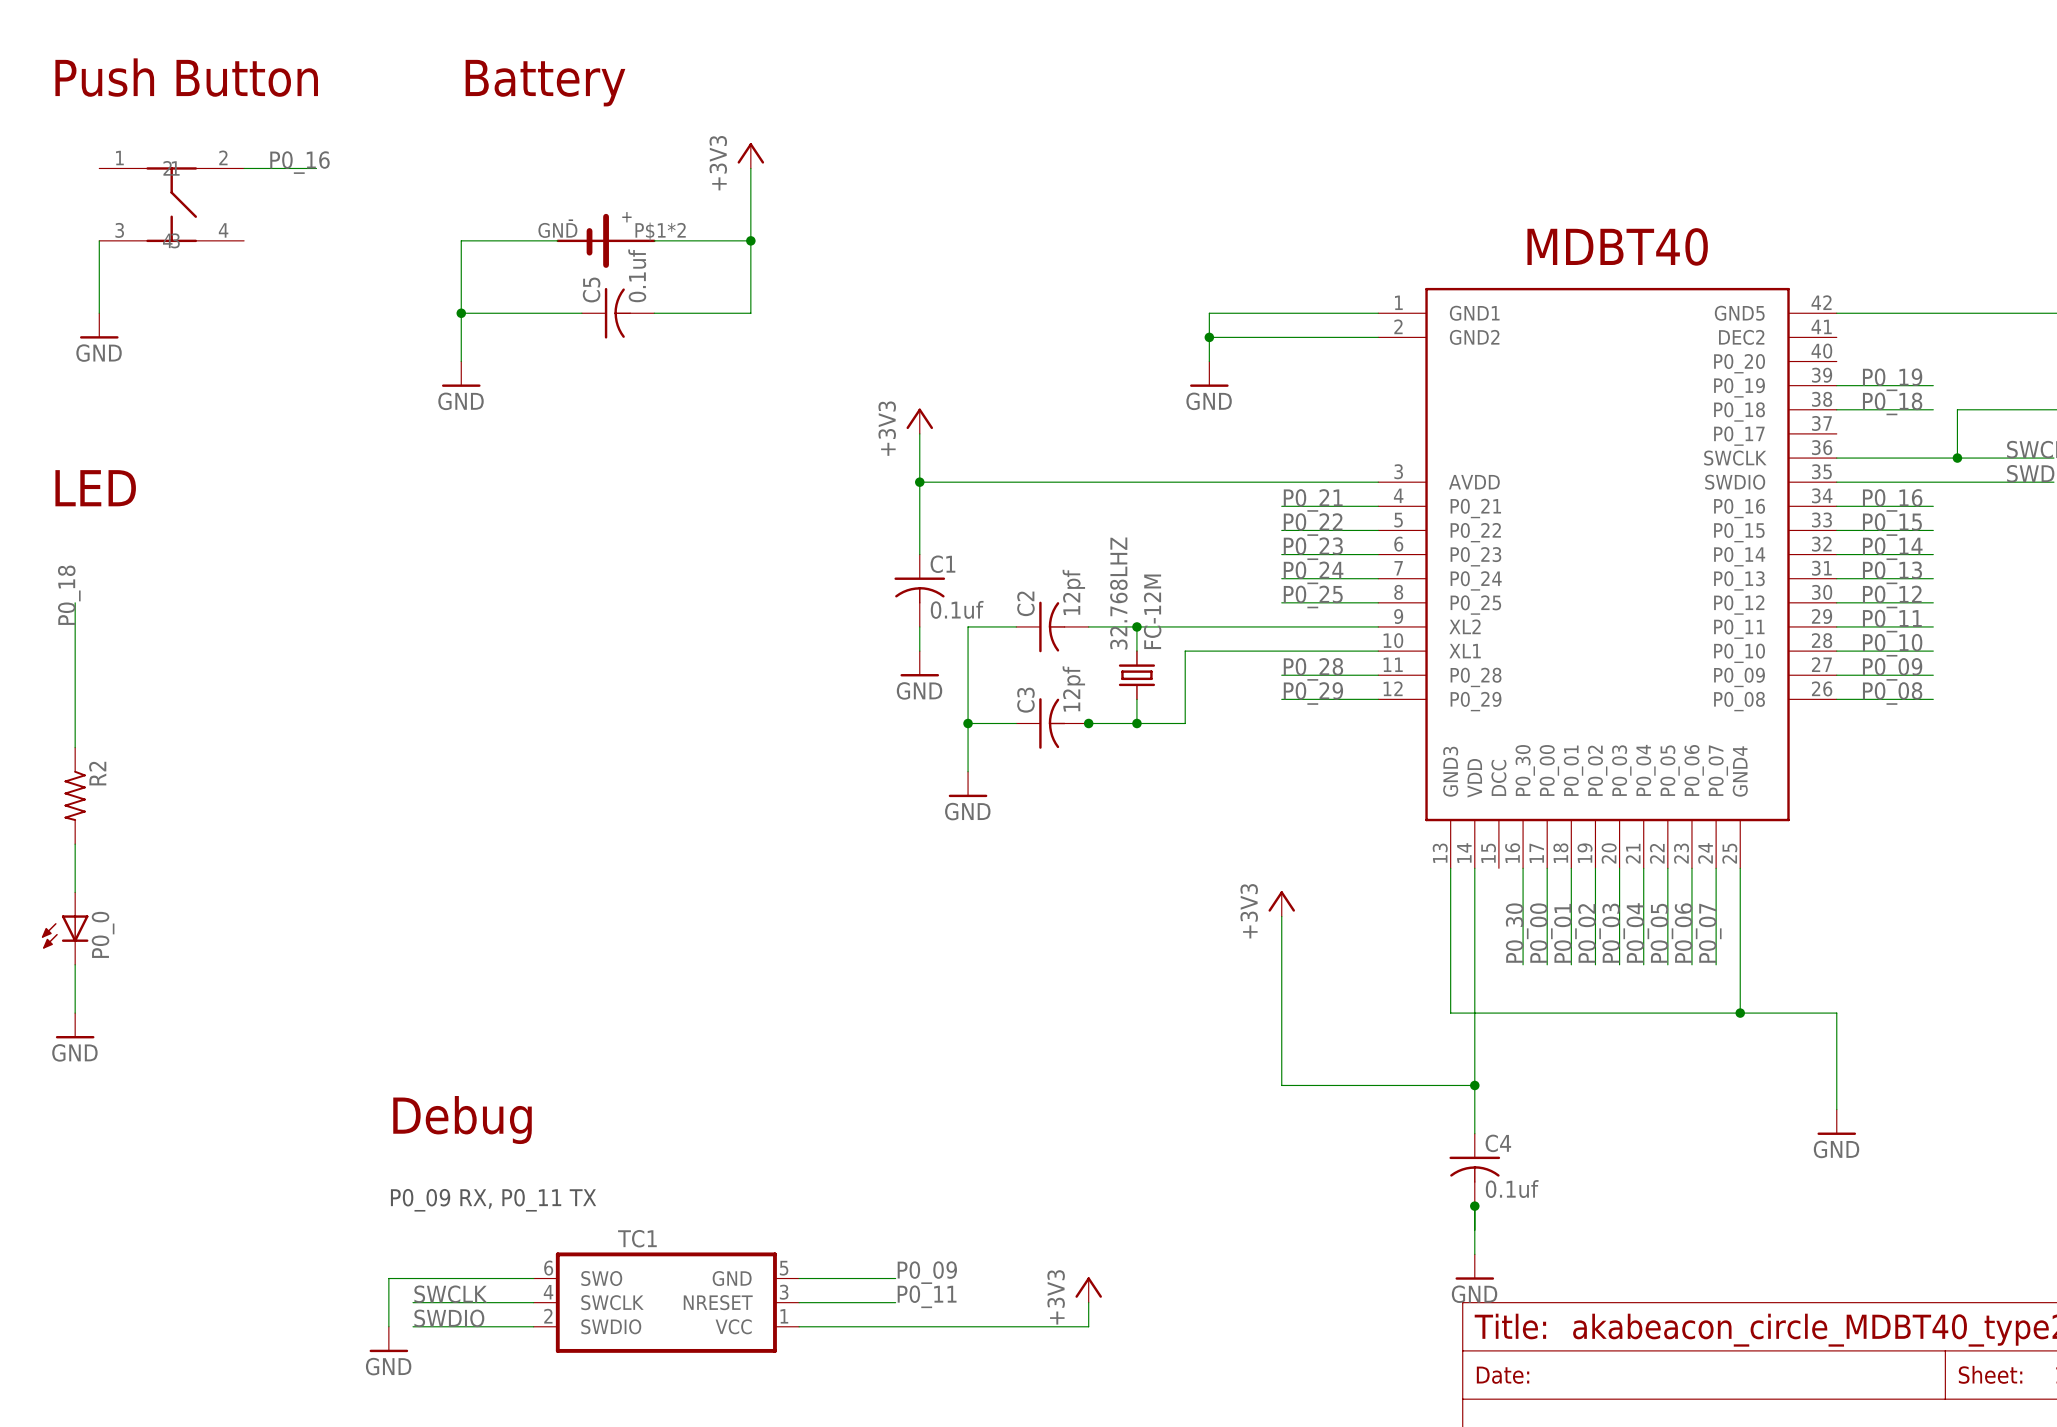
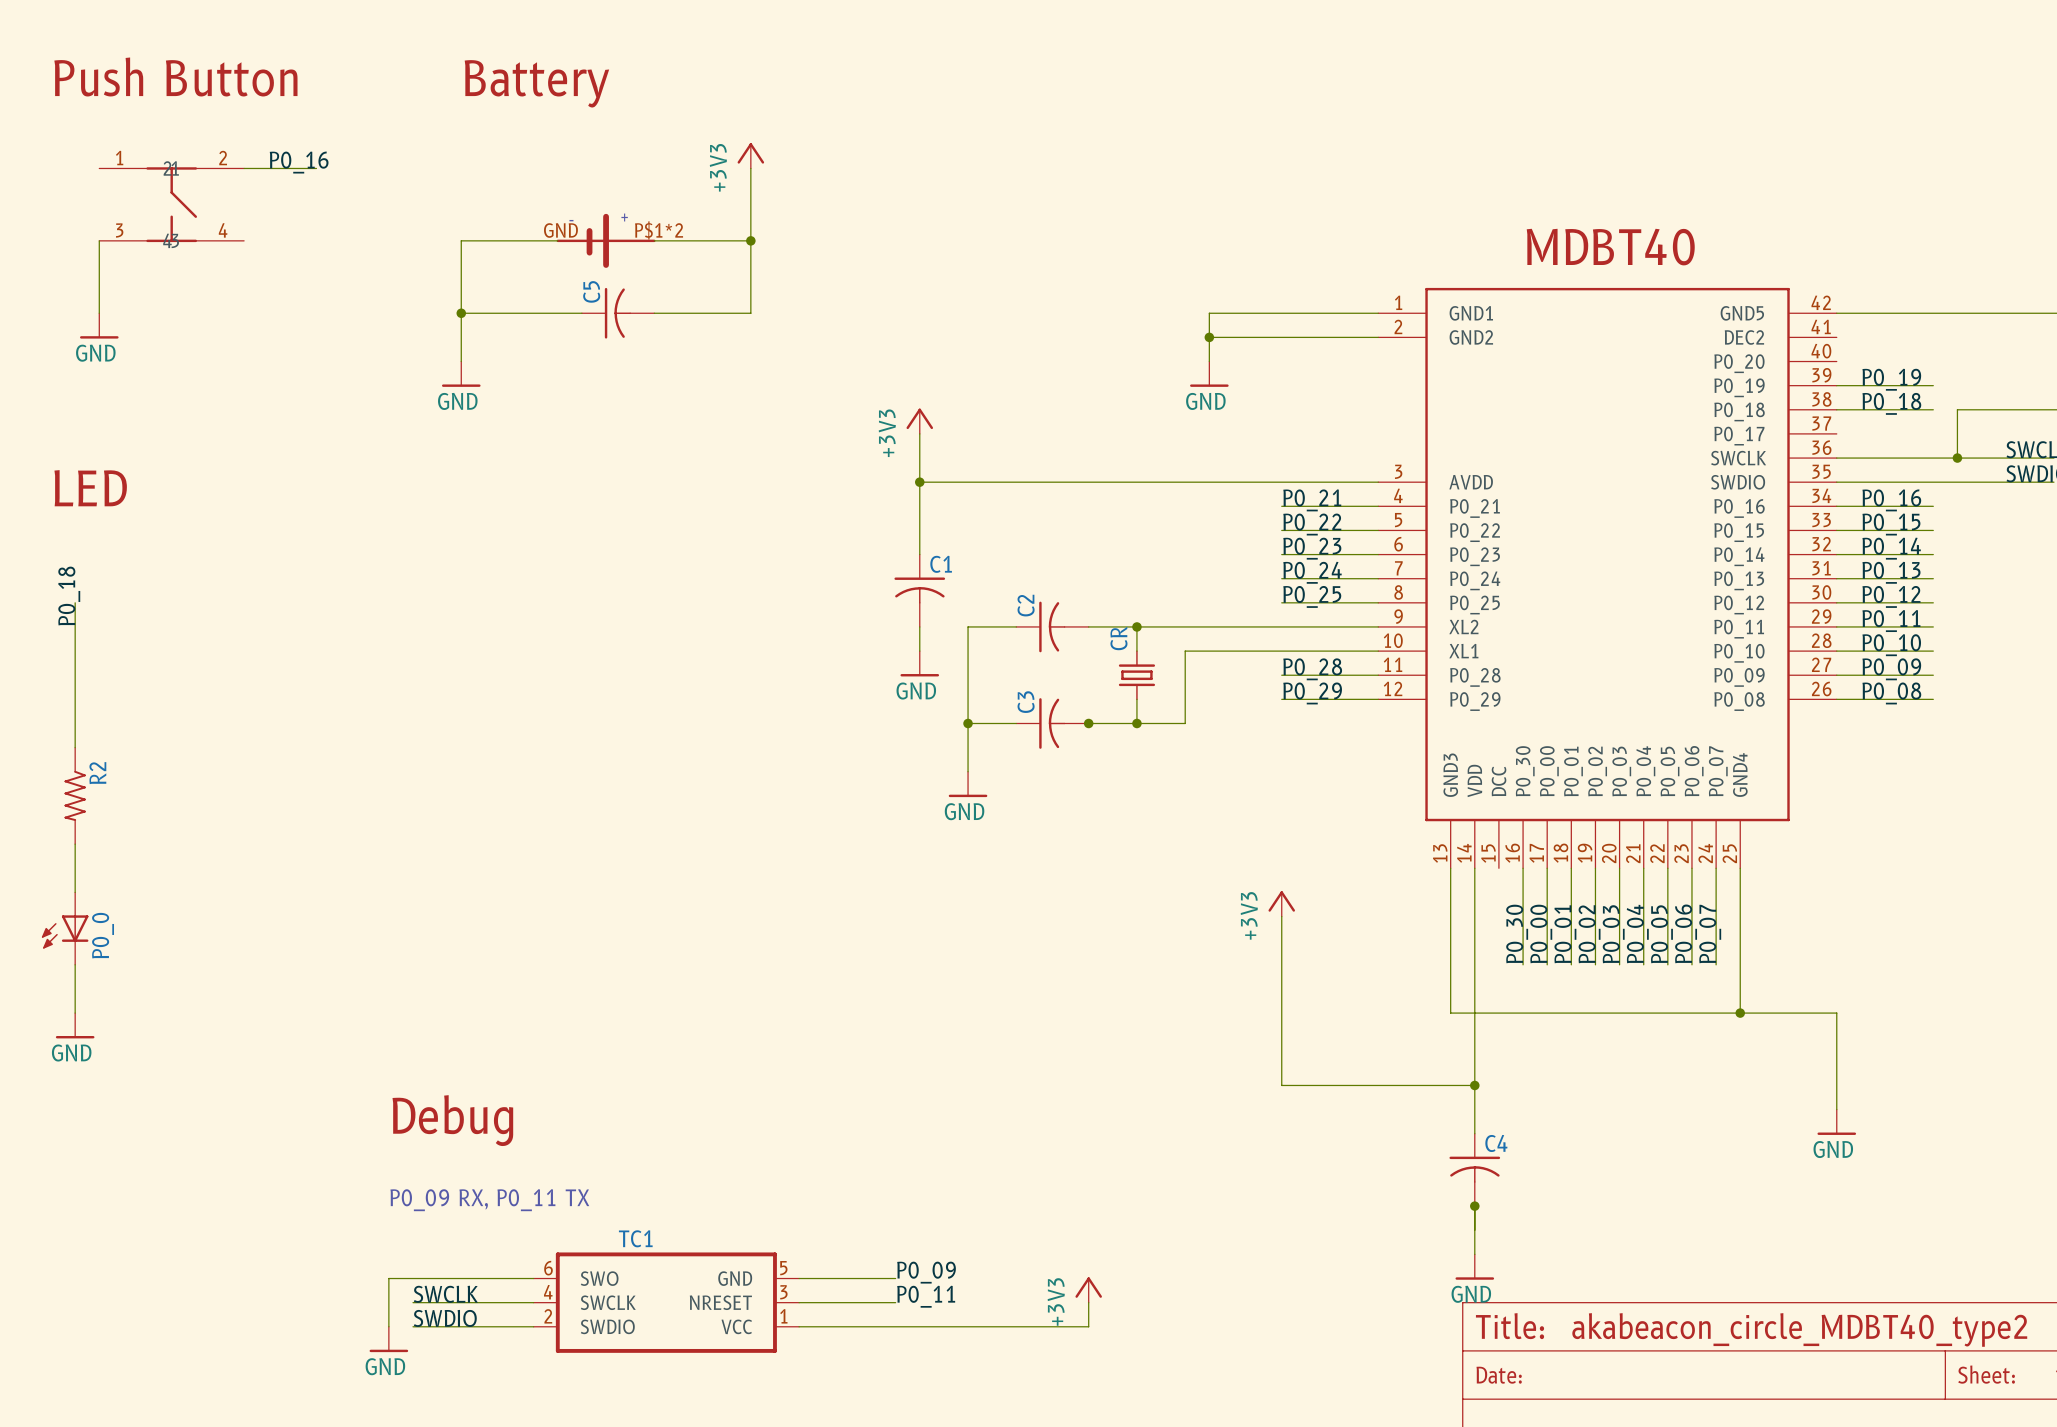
C5 value: 0.1uf (637, 275) -> none
C2 value: 12pf (1073, 592) -> none
32.768LHZ name: 32.768LHZ (1118, 593) -> CR (1118, 638)
C1 value: 0.1uf (957, 609) -> none
32.768LHZ value: FC-12M (1152, 611) -> none
C3 value: 12pf (1073, 688) -> none
C4 value: 0.1uf (1512, 1189) -> none

